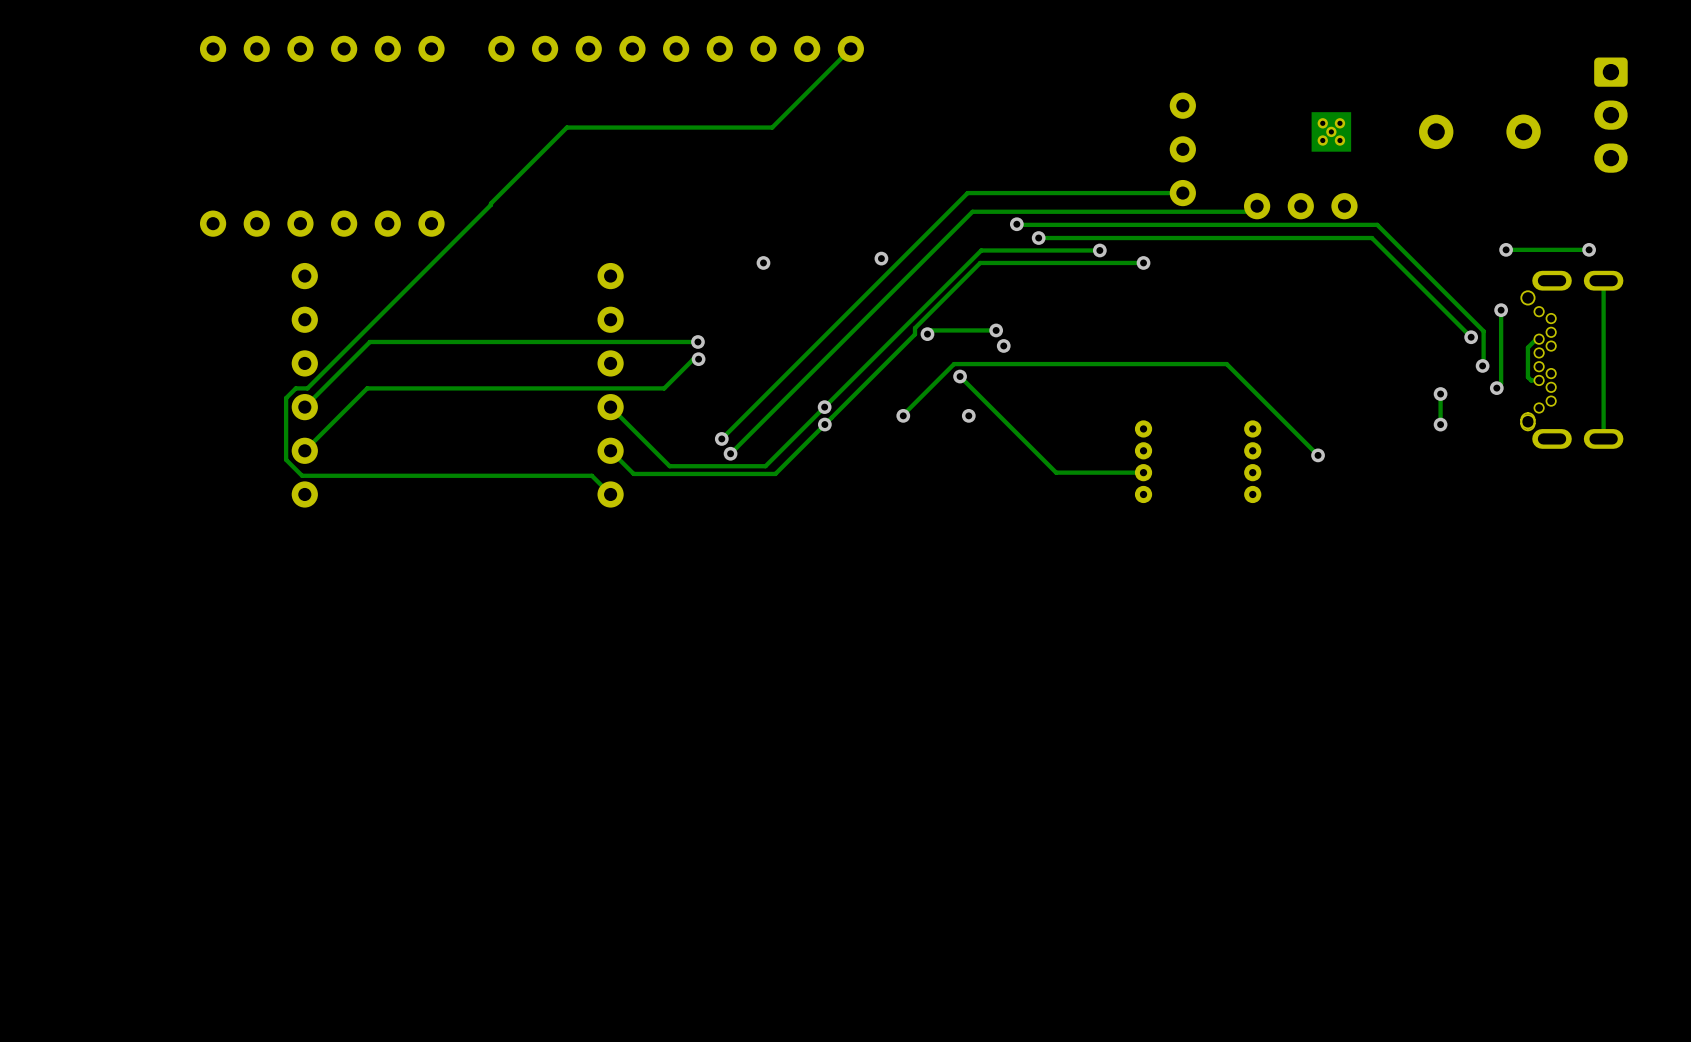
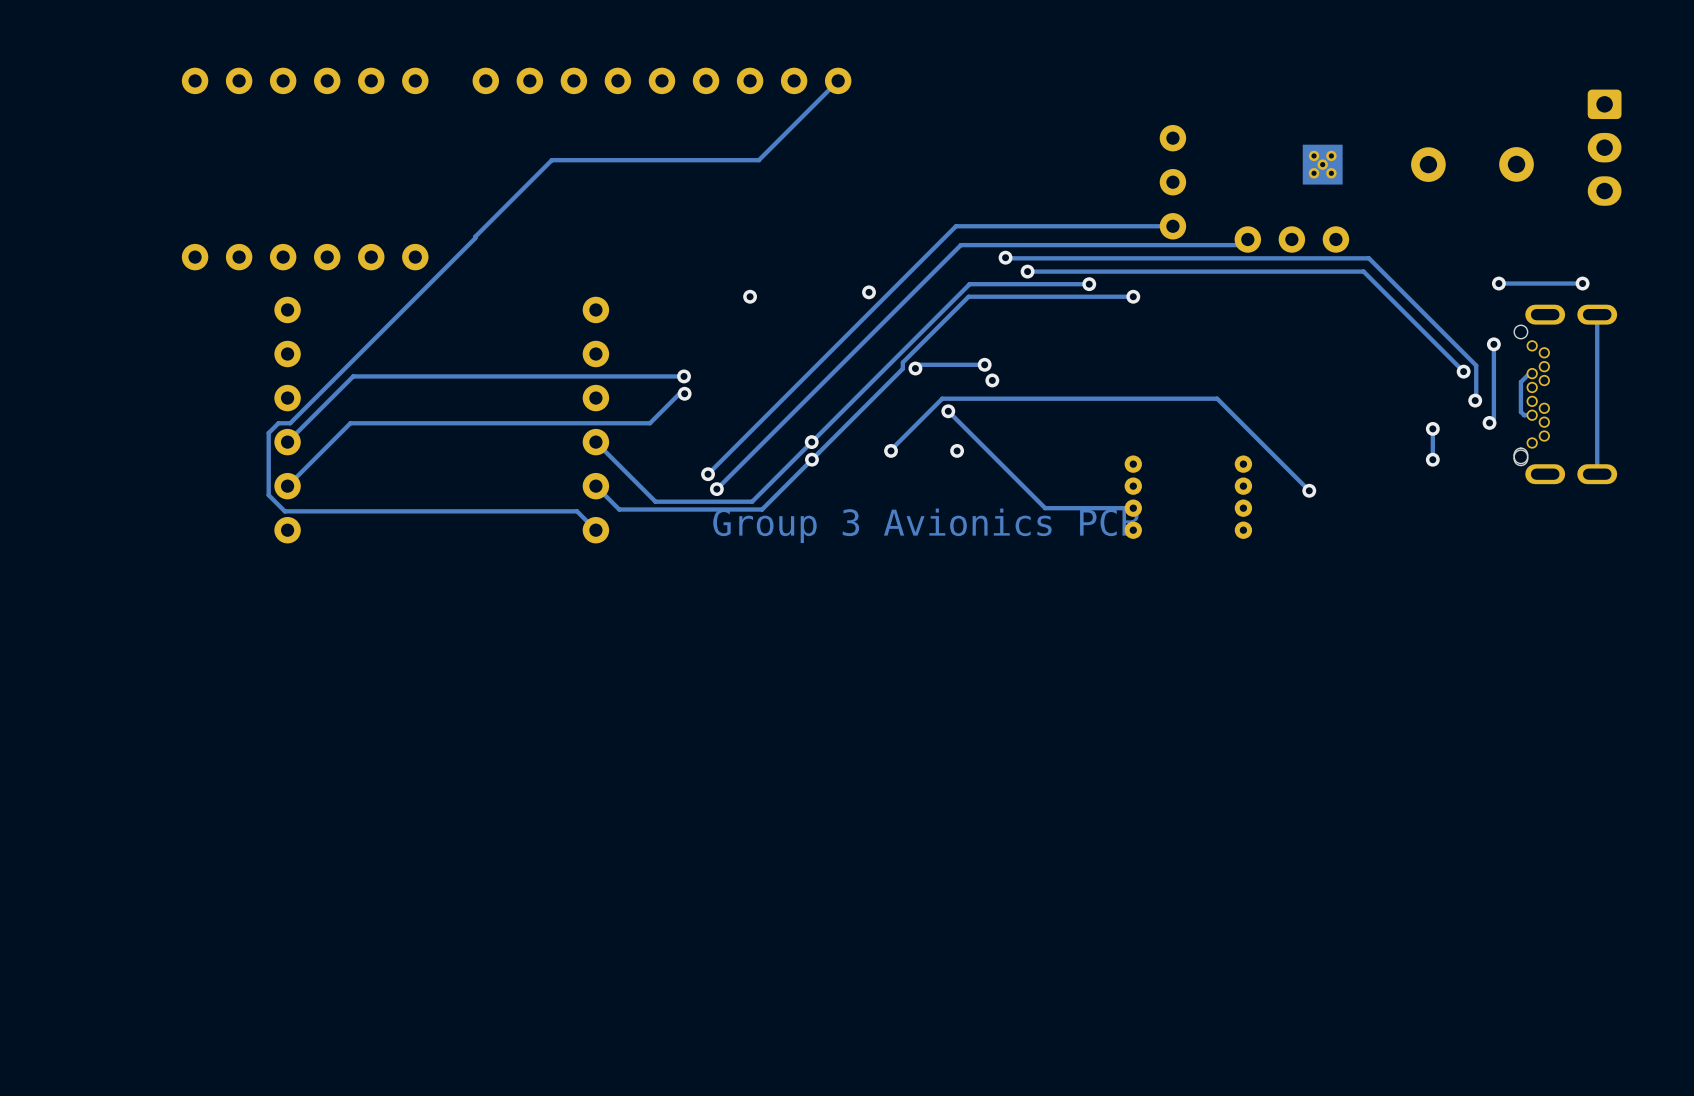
text: none -> Group 3 Avionics PCB (926, 525)

